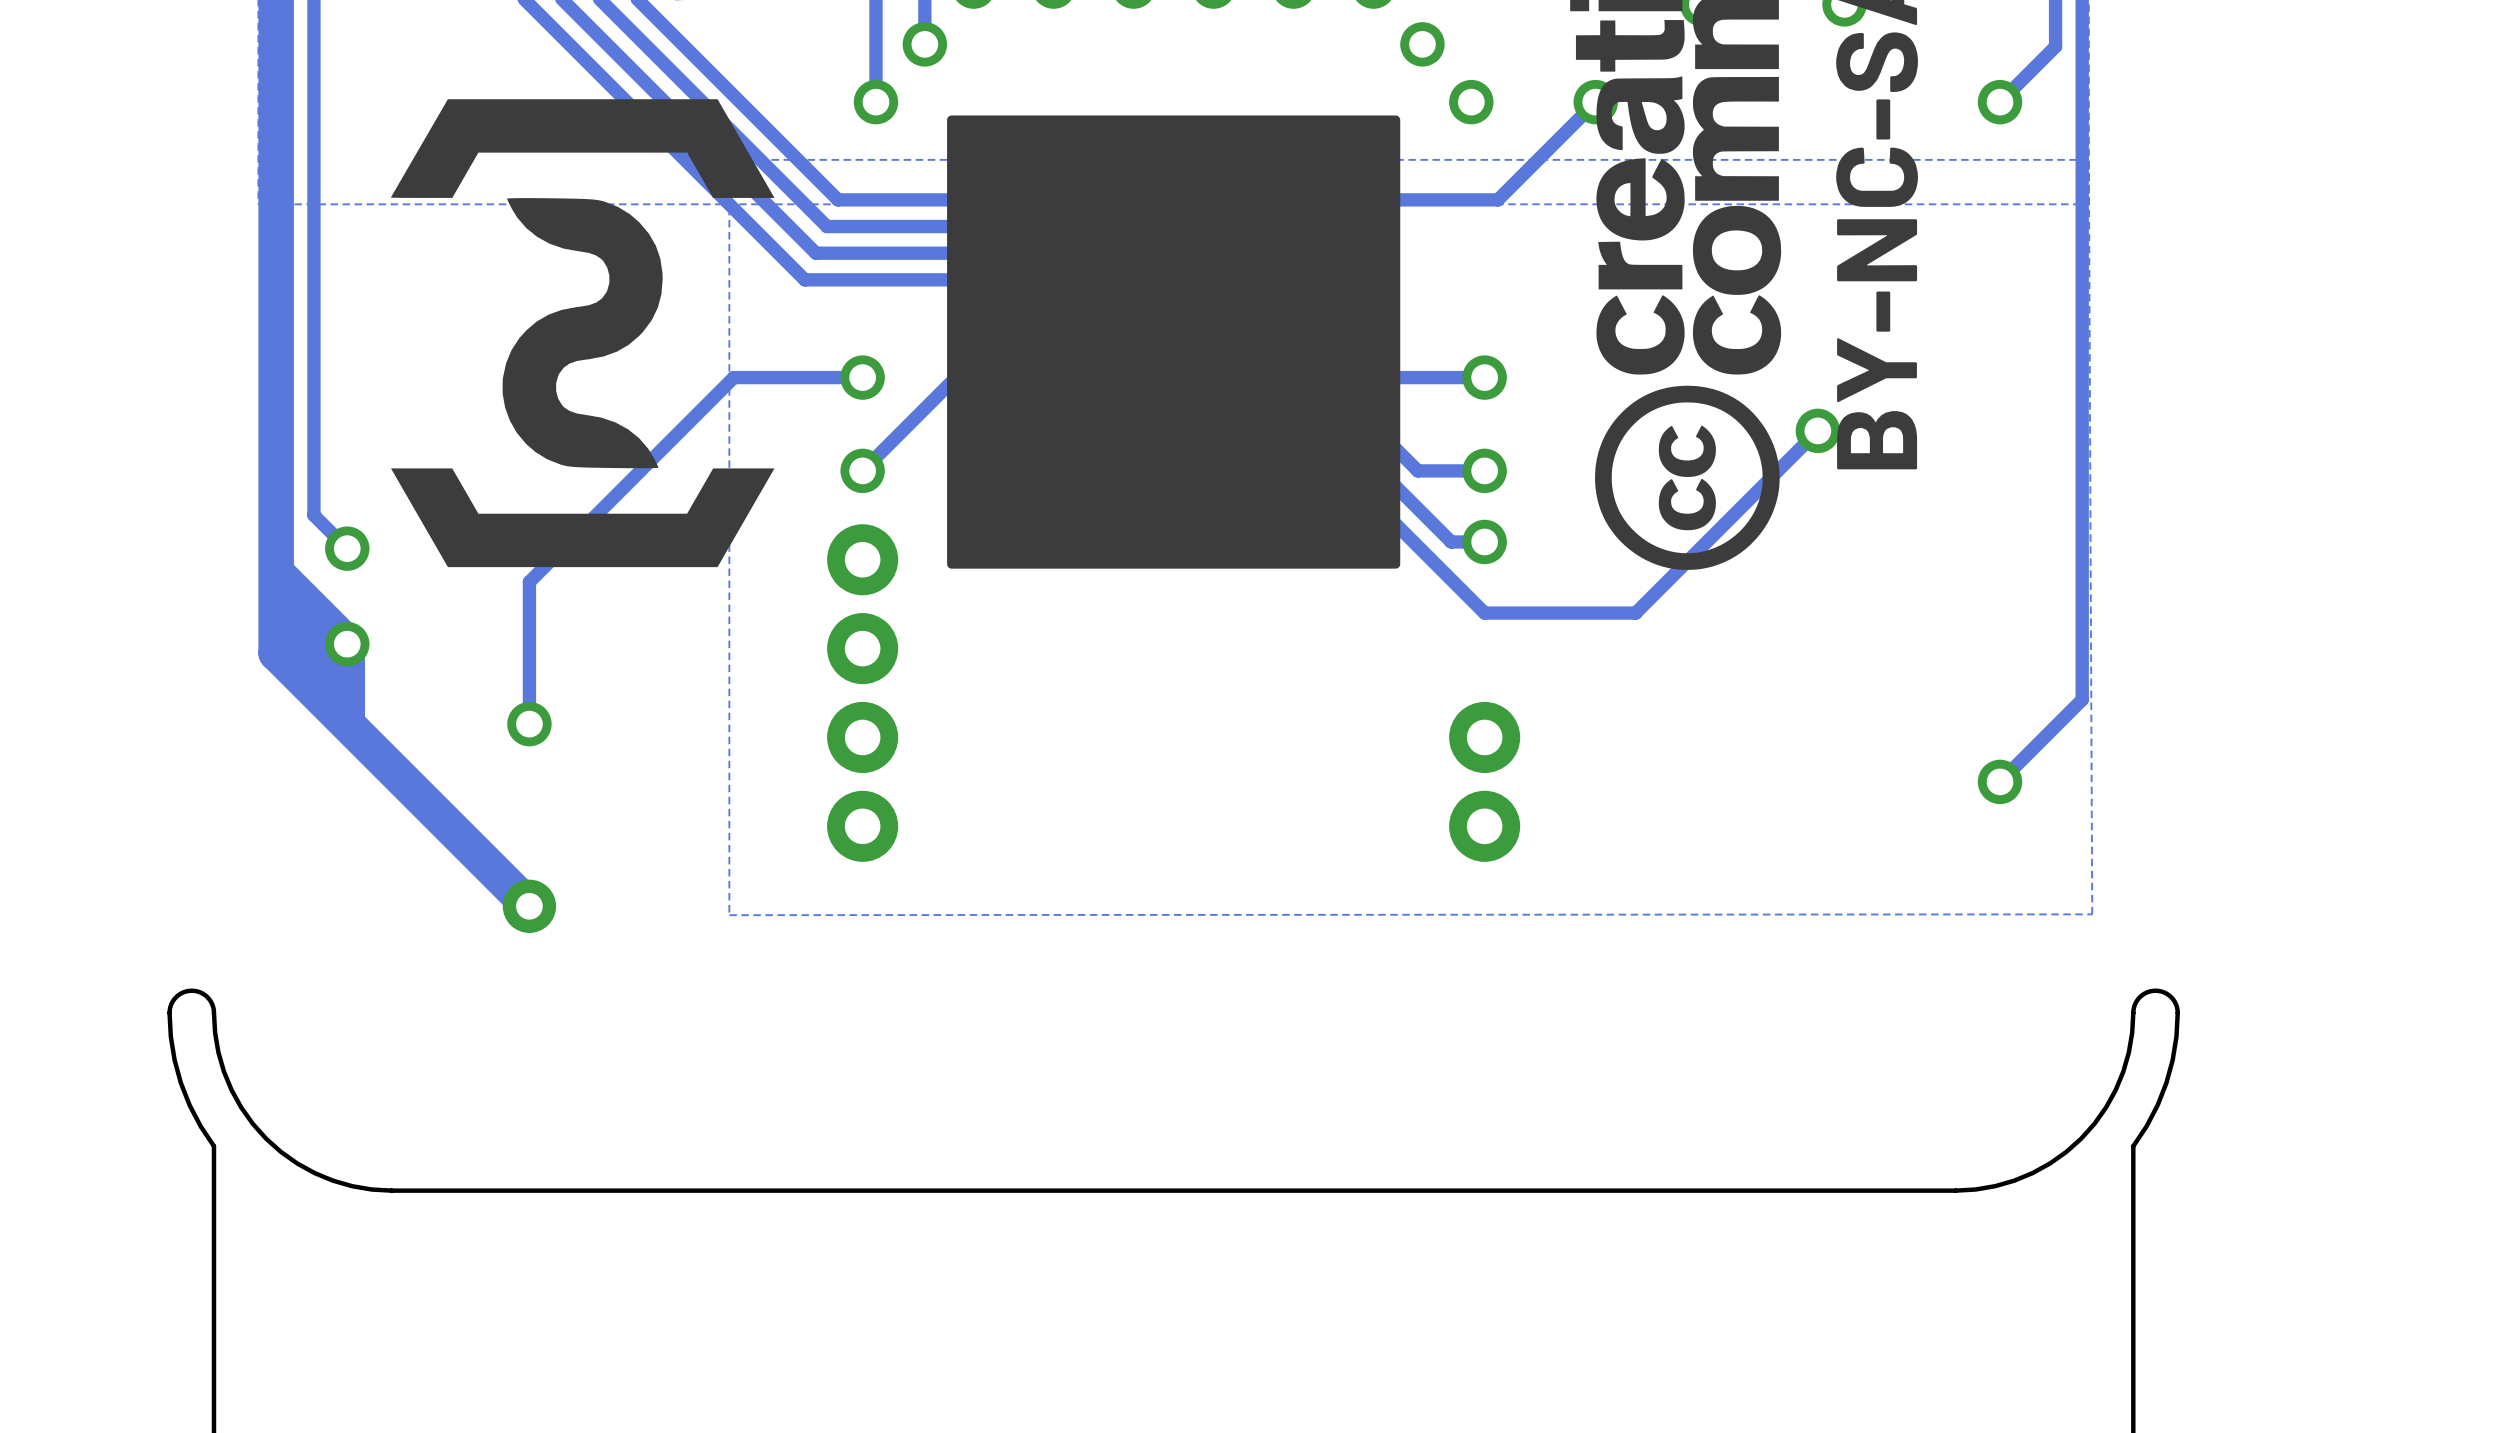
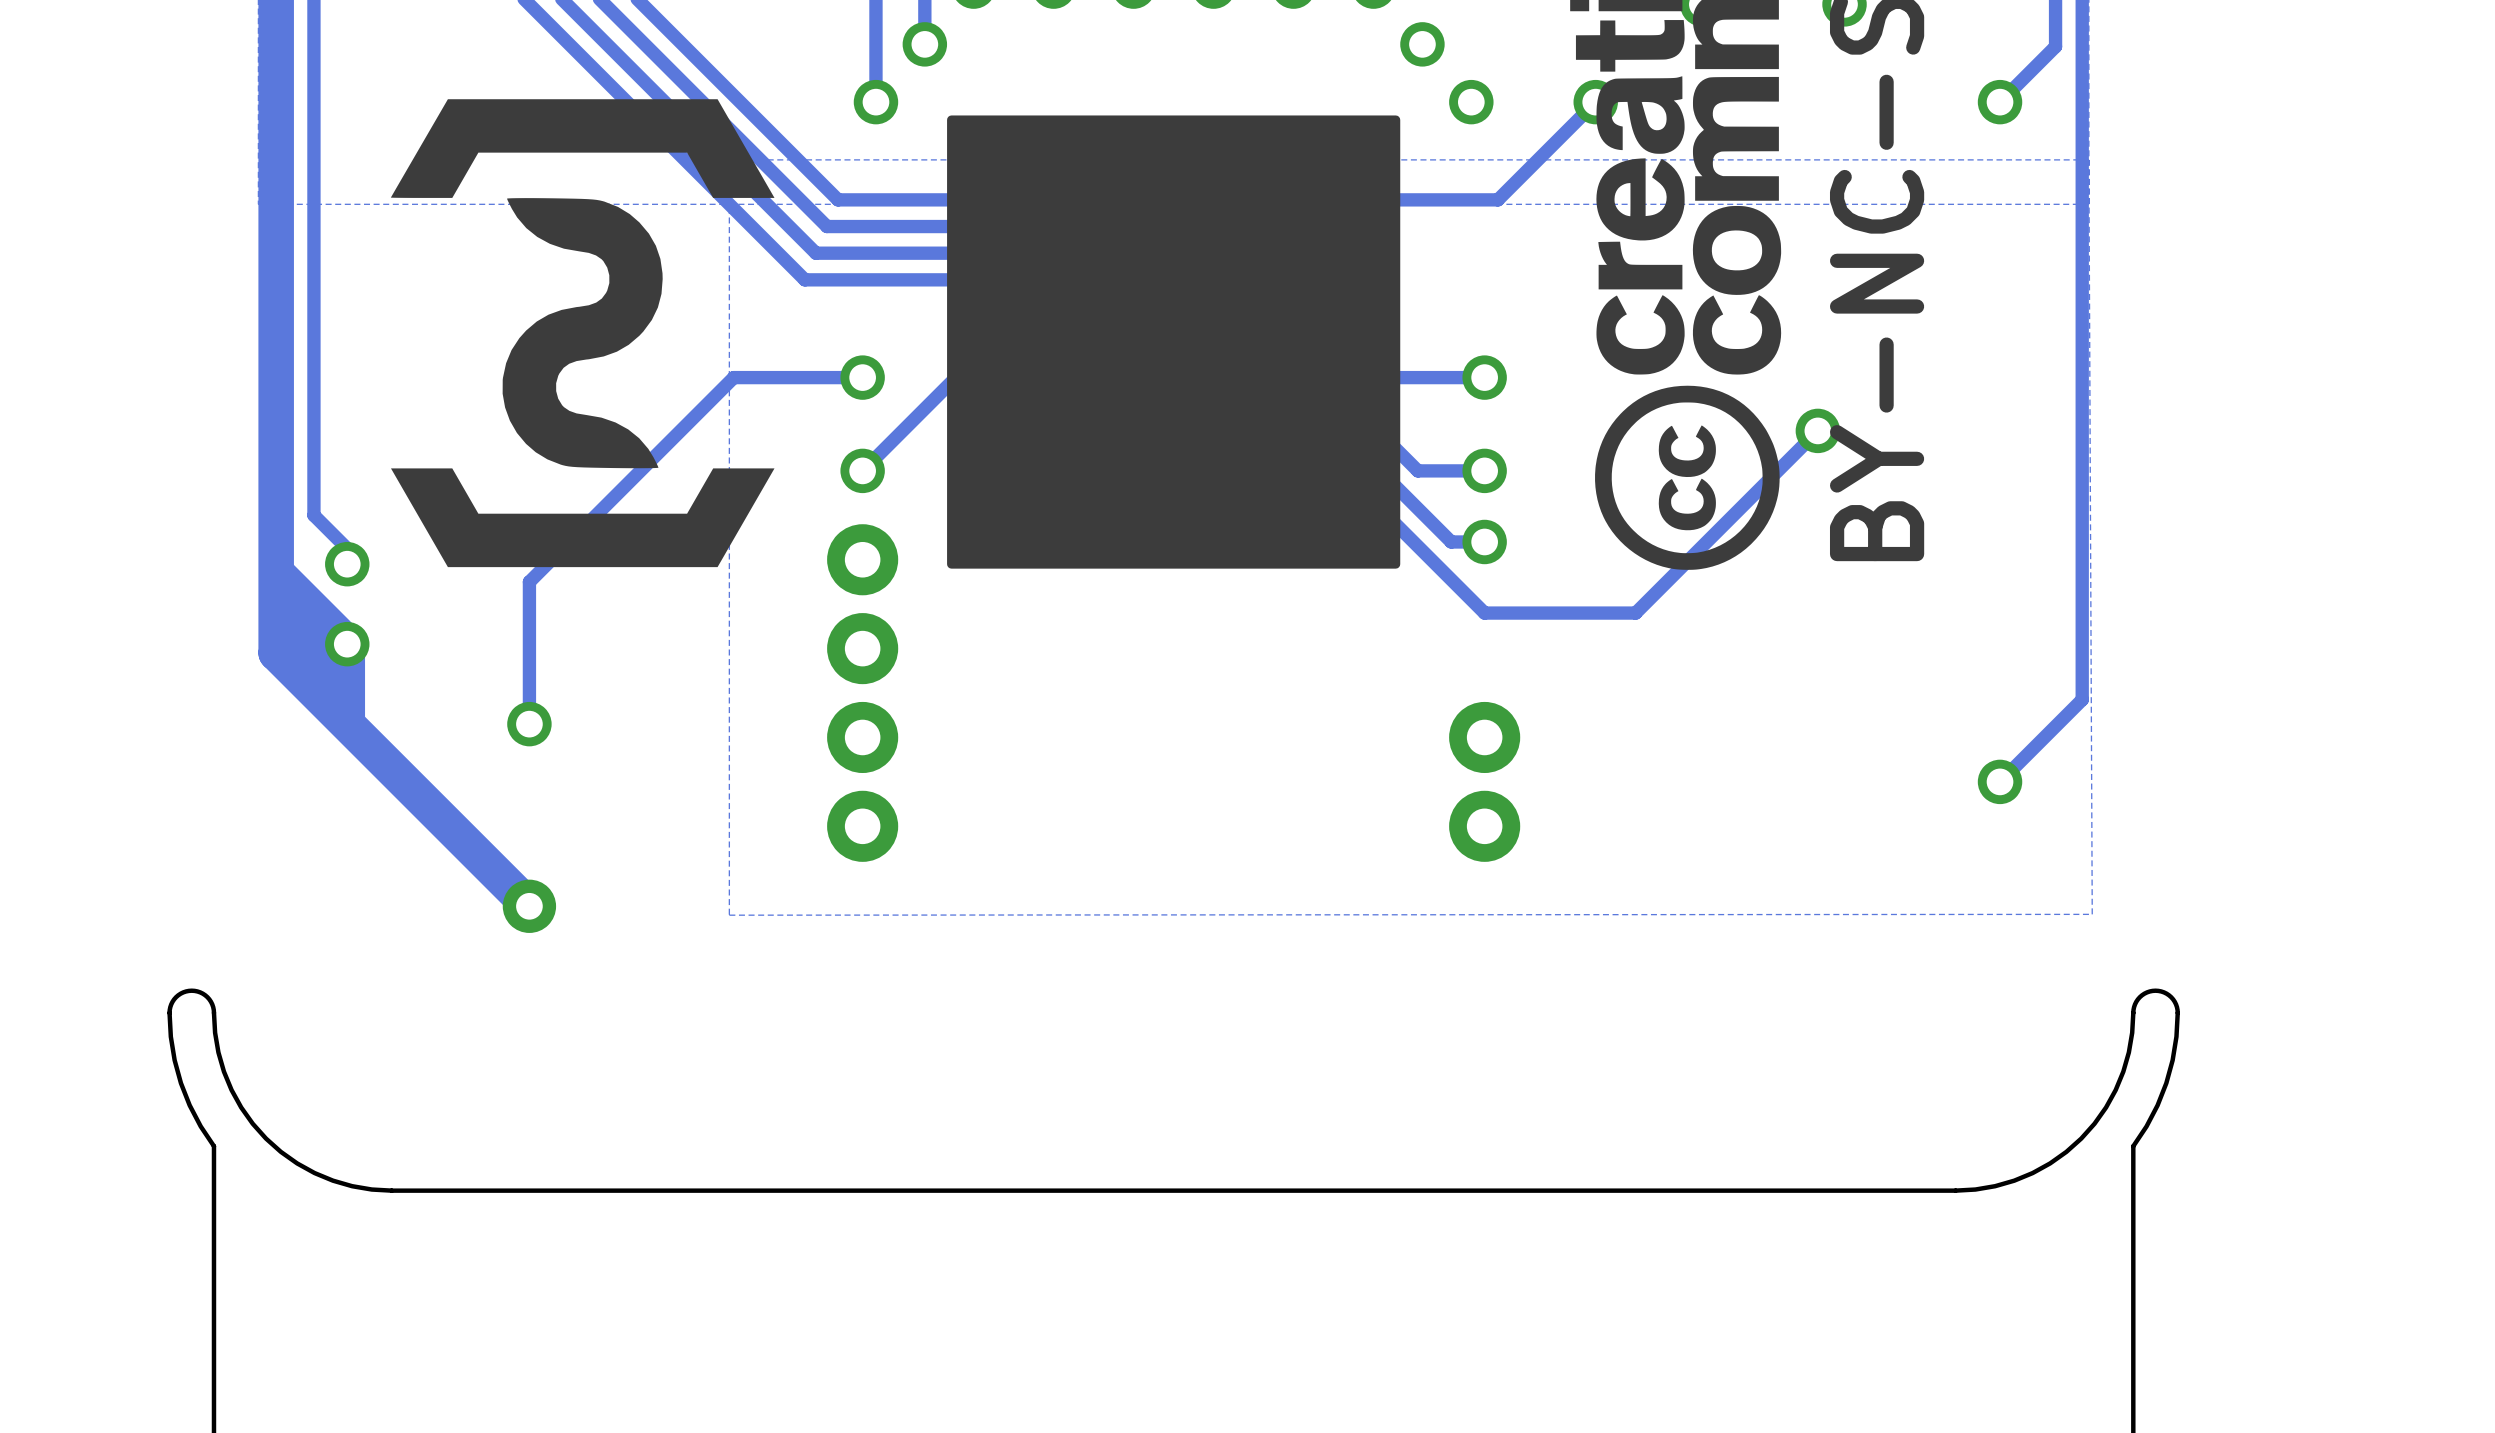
via position: (347, 548) -> (347, 564)

